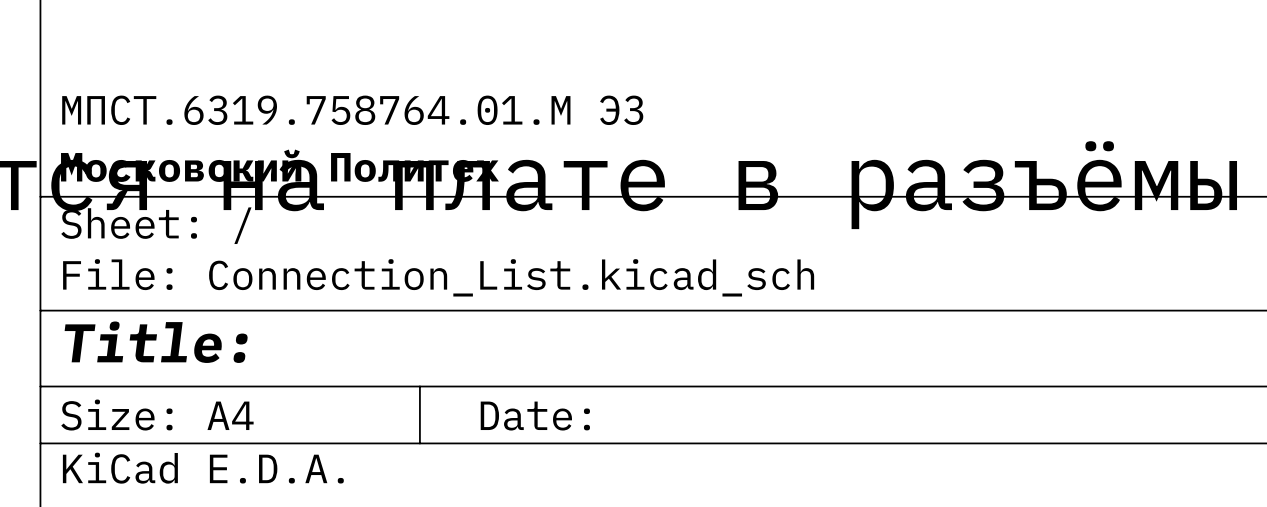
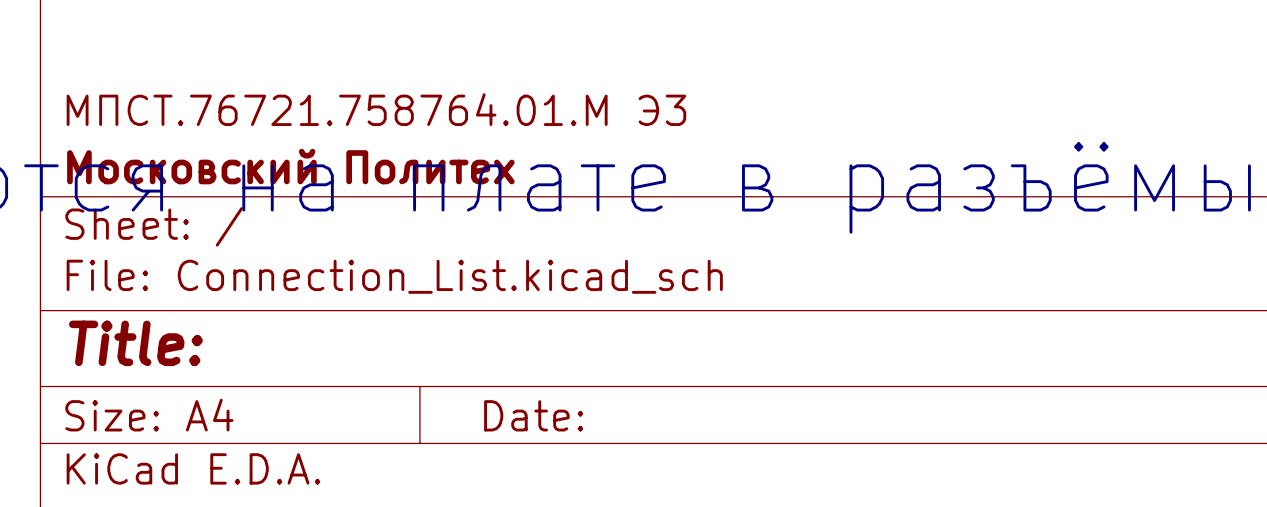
title block: МПСТ.6319.758764.01.М Э3 (352, 110) -> МПСТ.76721.758764.01.М Э3 (376, 109)

